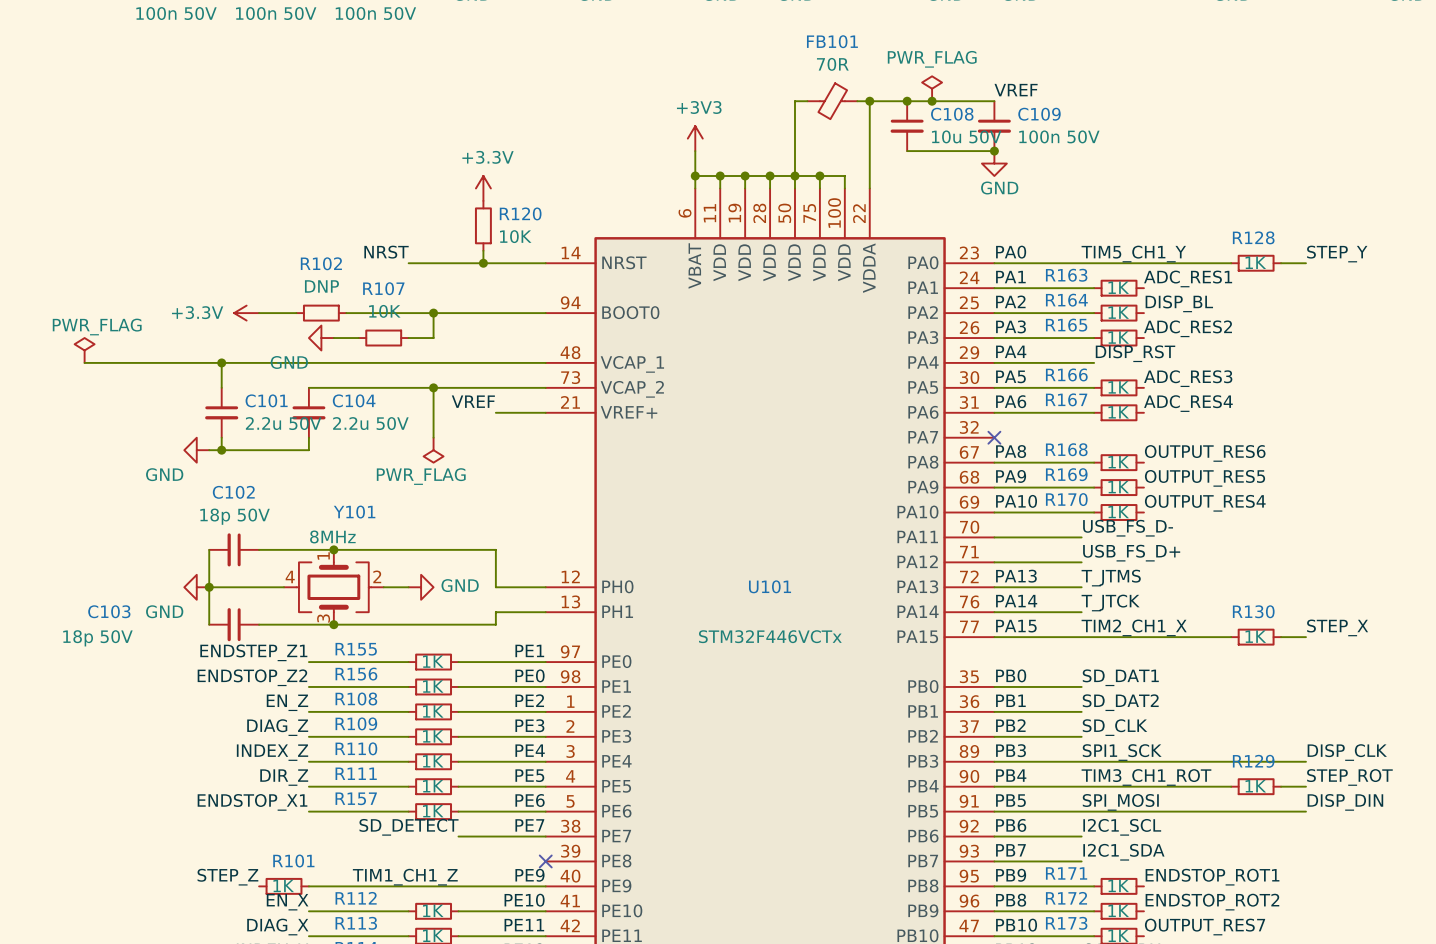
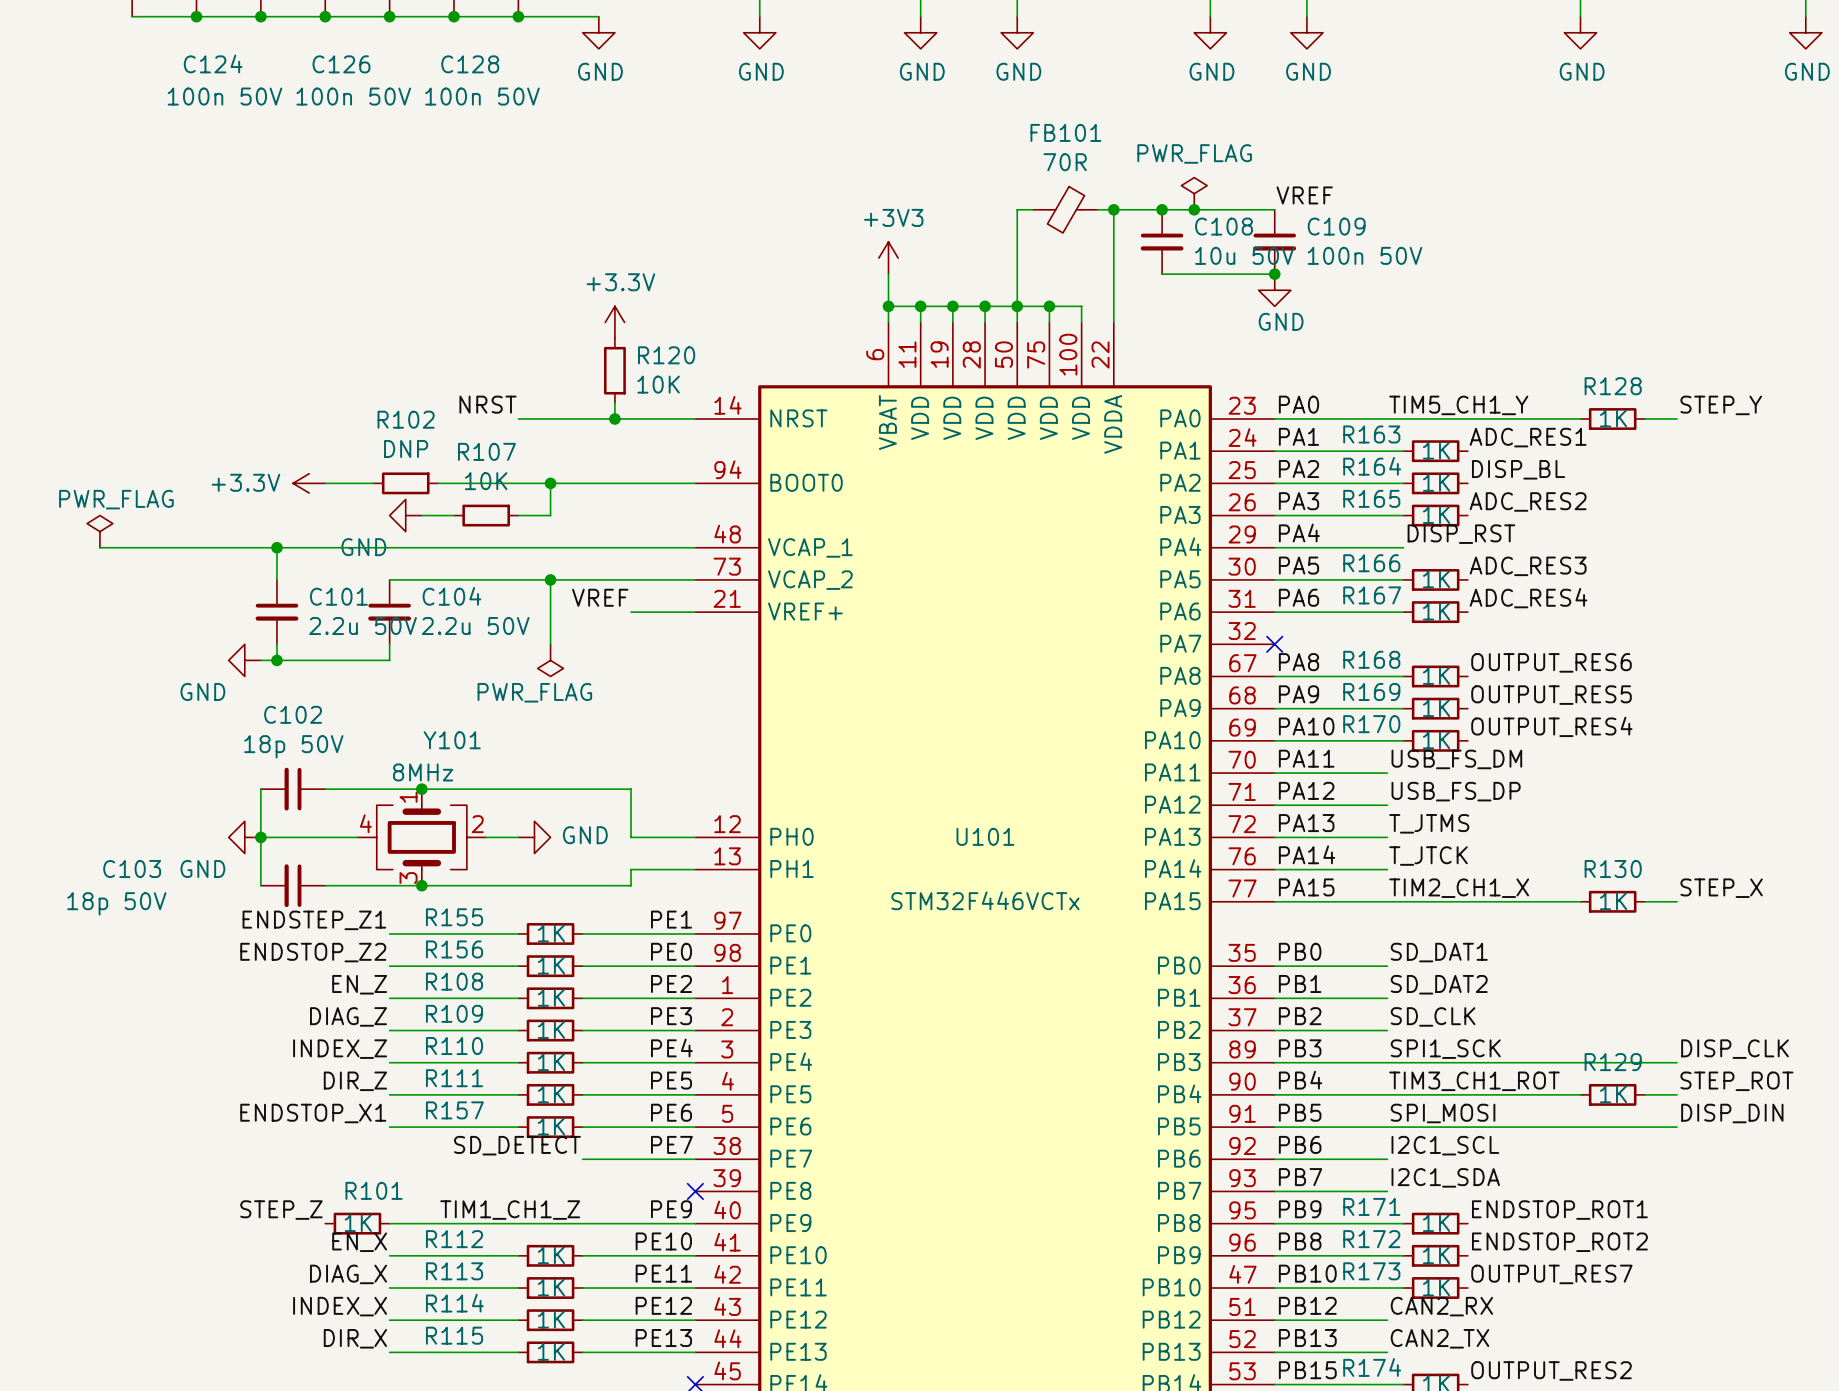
label: none -> PA11 (1306, 758)
label: USB_FS_D- (1128, 528) -> USB_FS_DM (1456, 759)
label: none -> PA12 (1306, 790)
label: USB_FS_D+ (1131, 553) -> USB_FS_DP (1456, 791)

